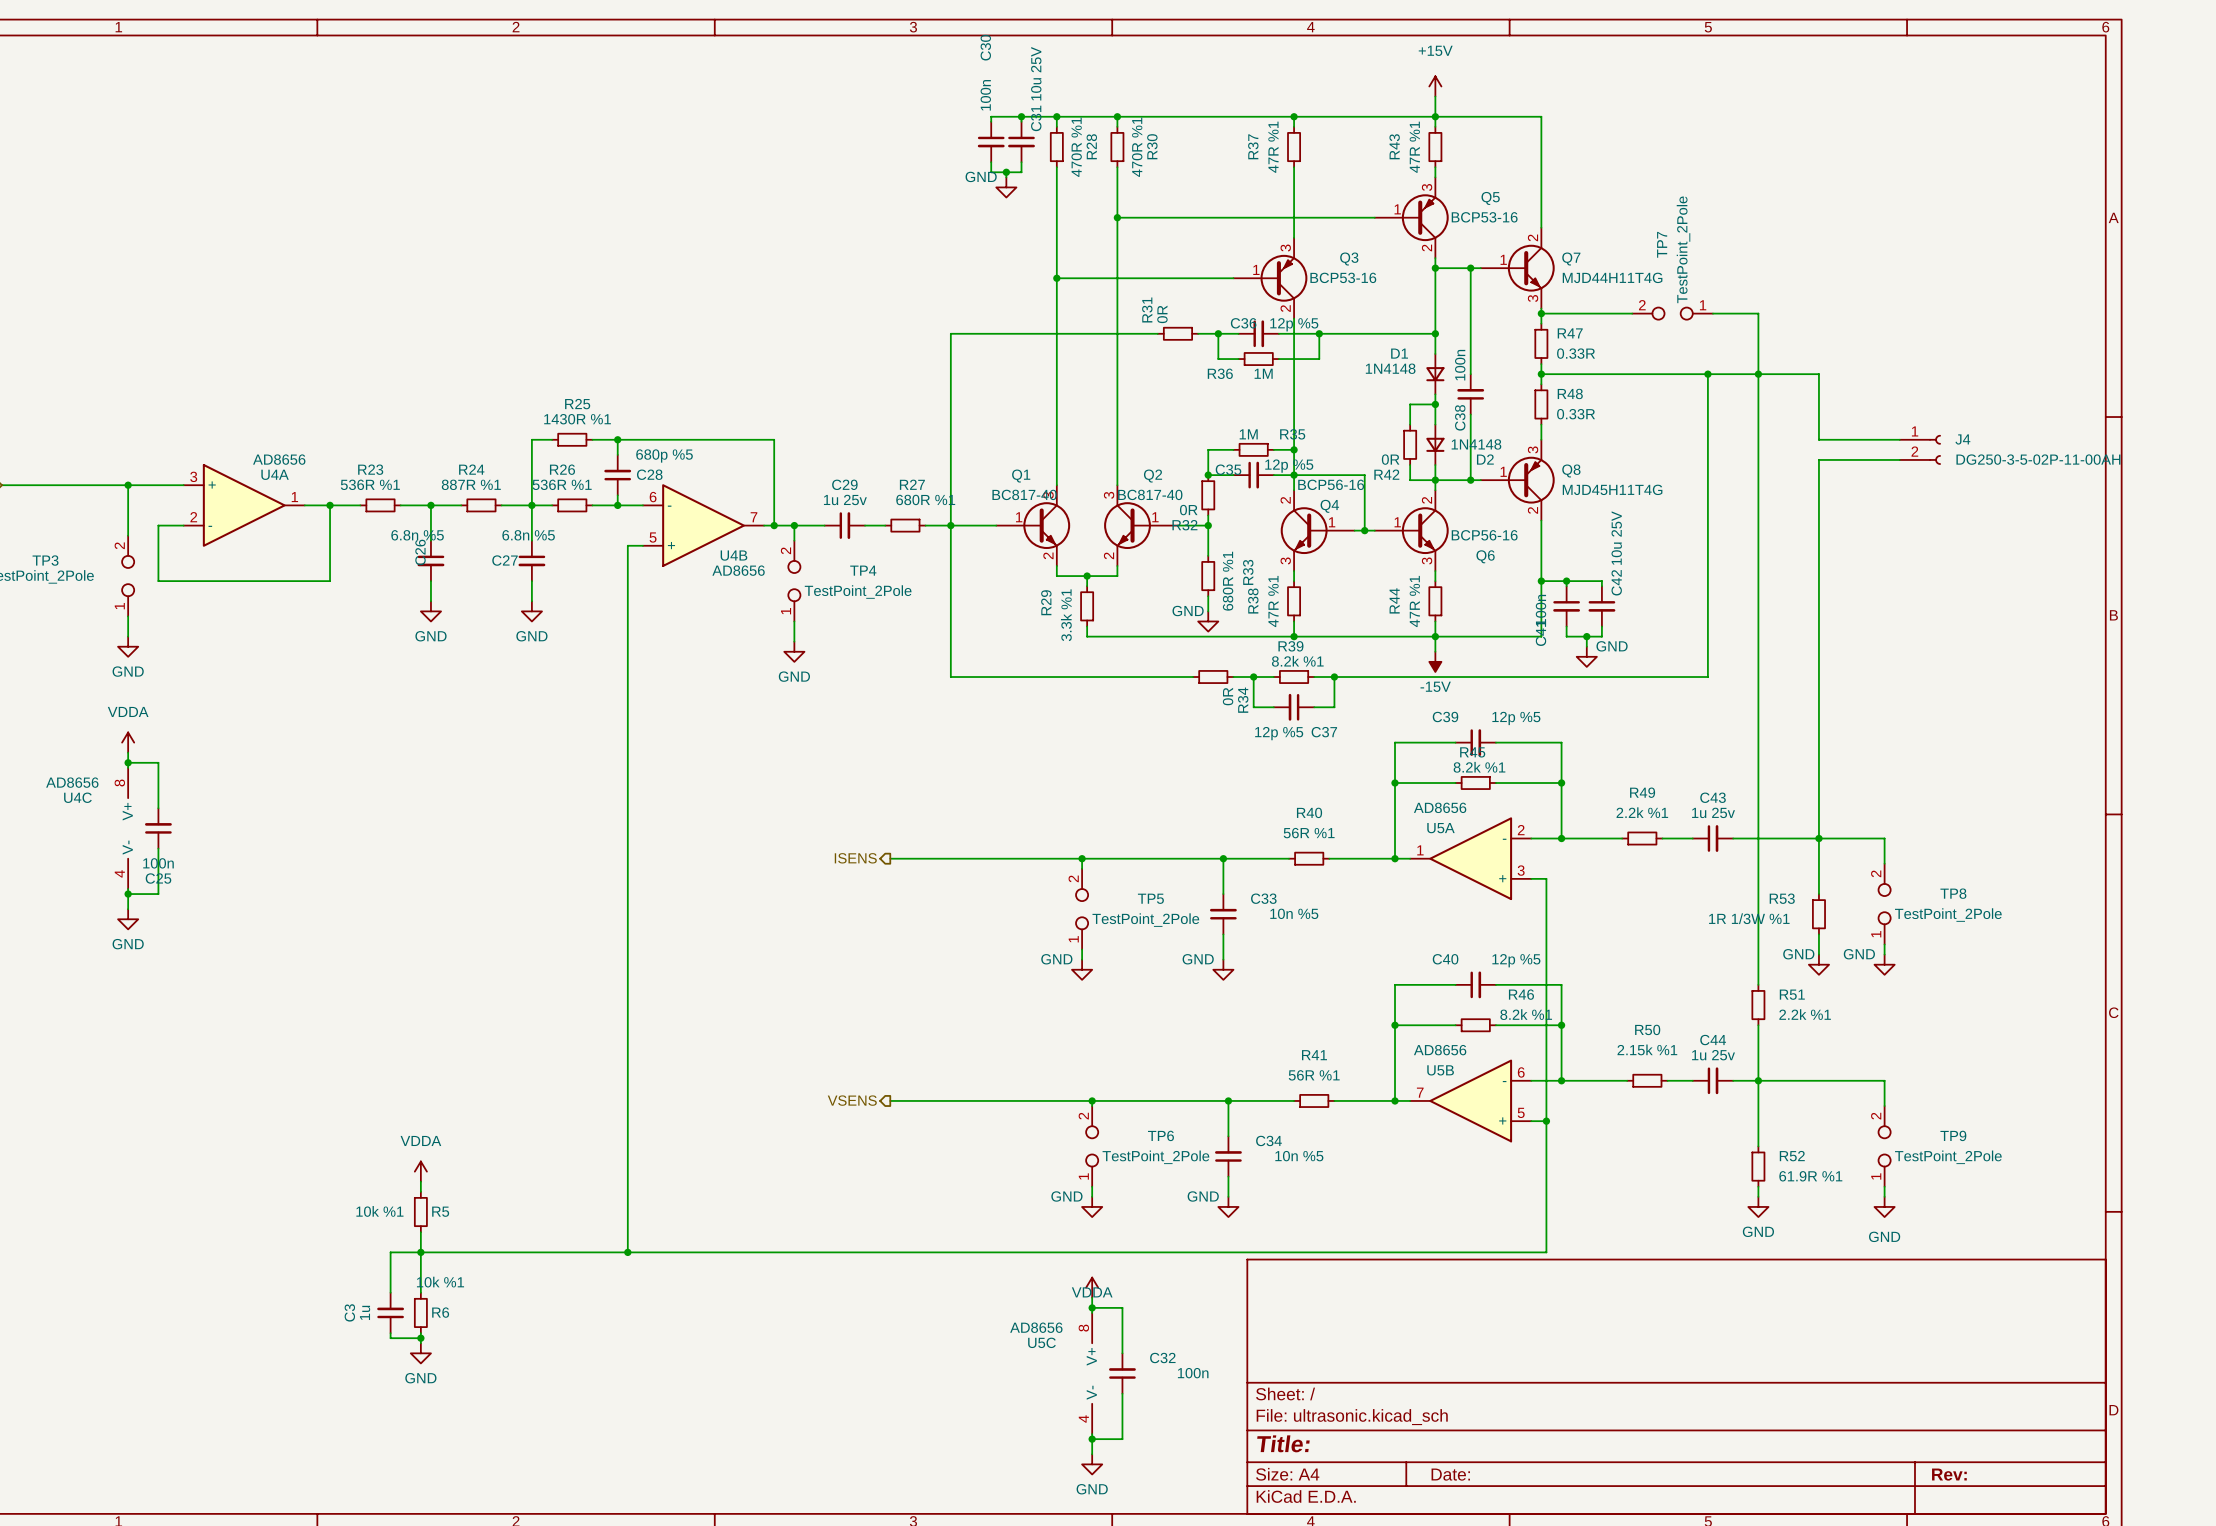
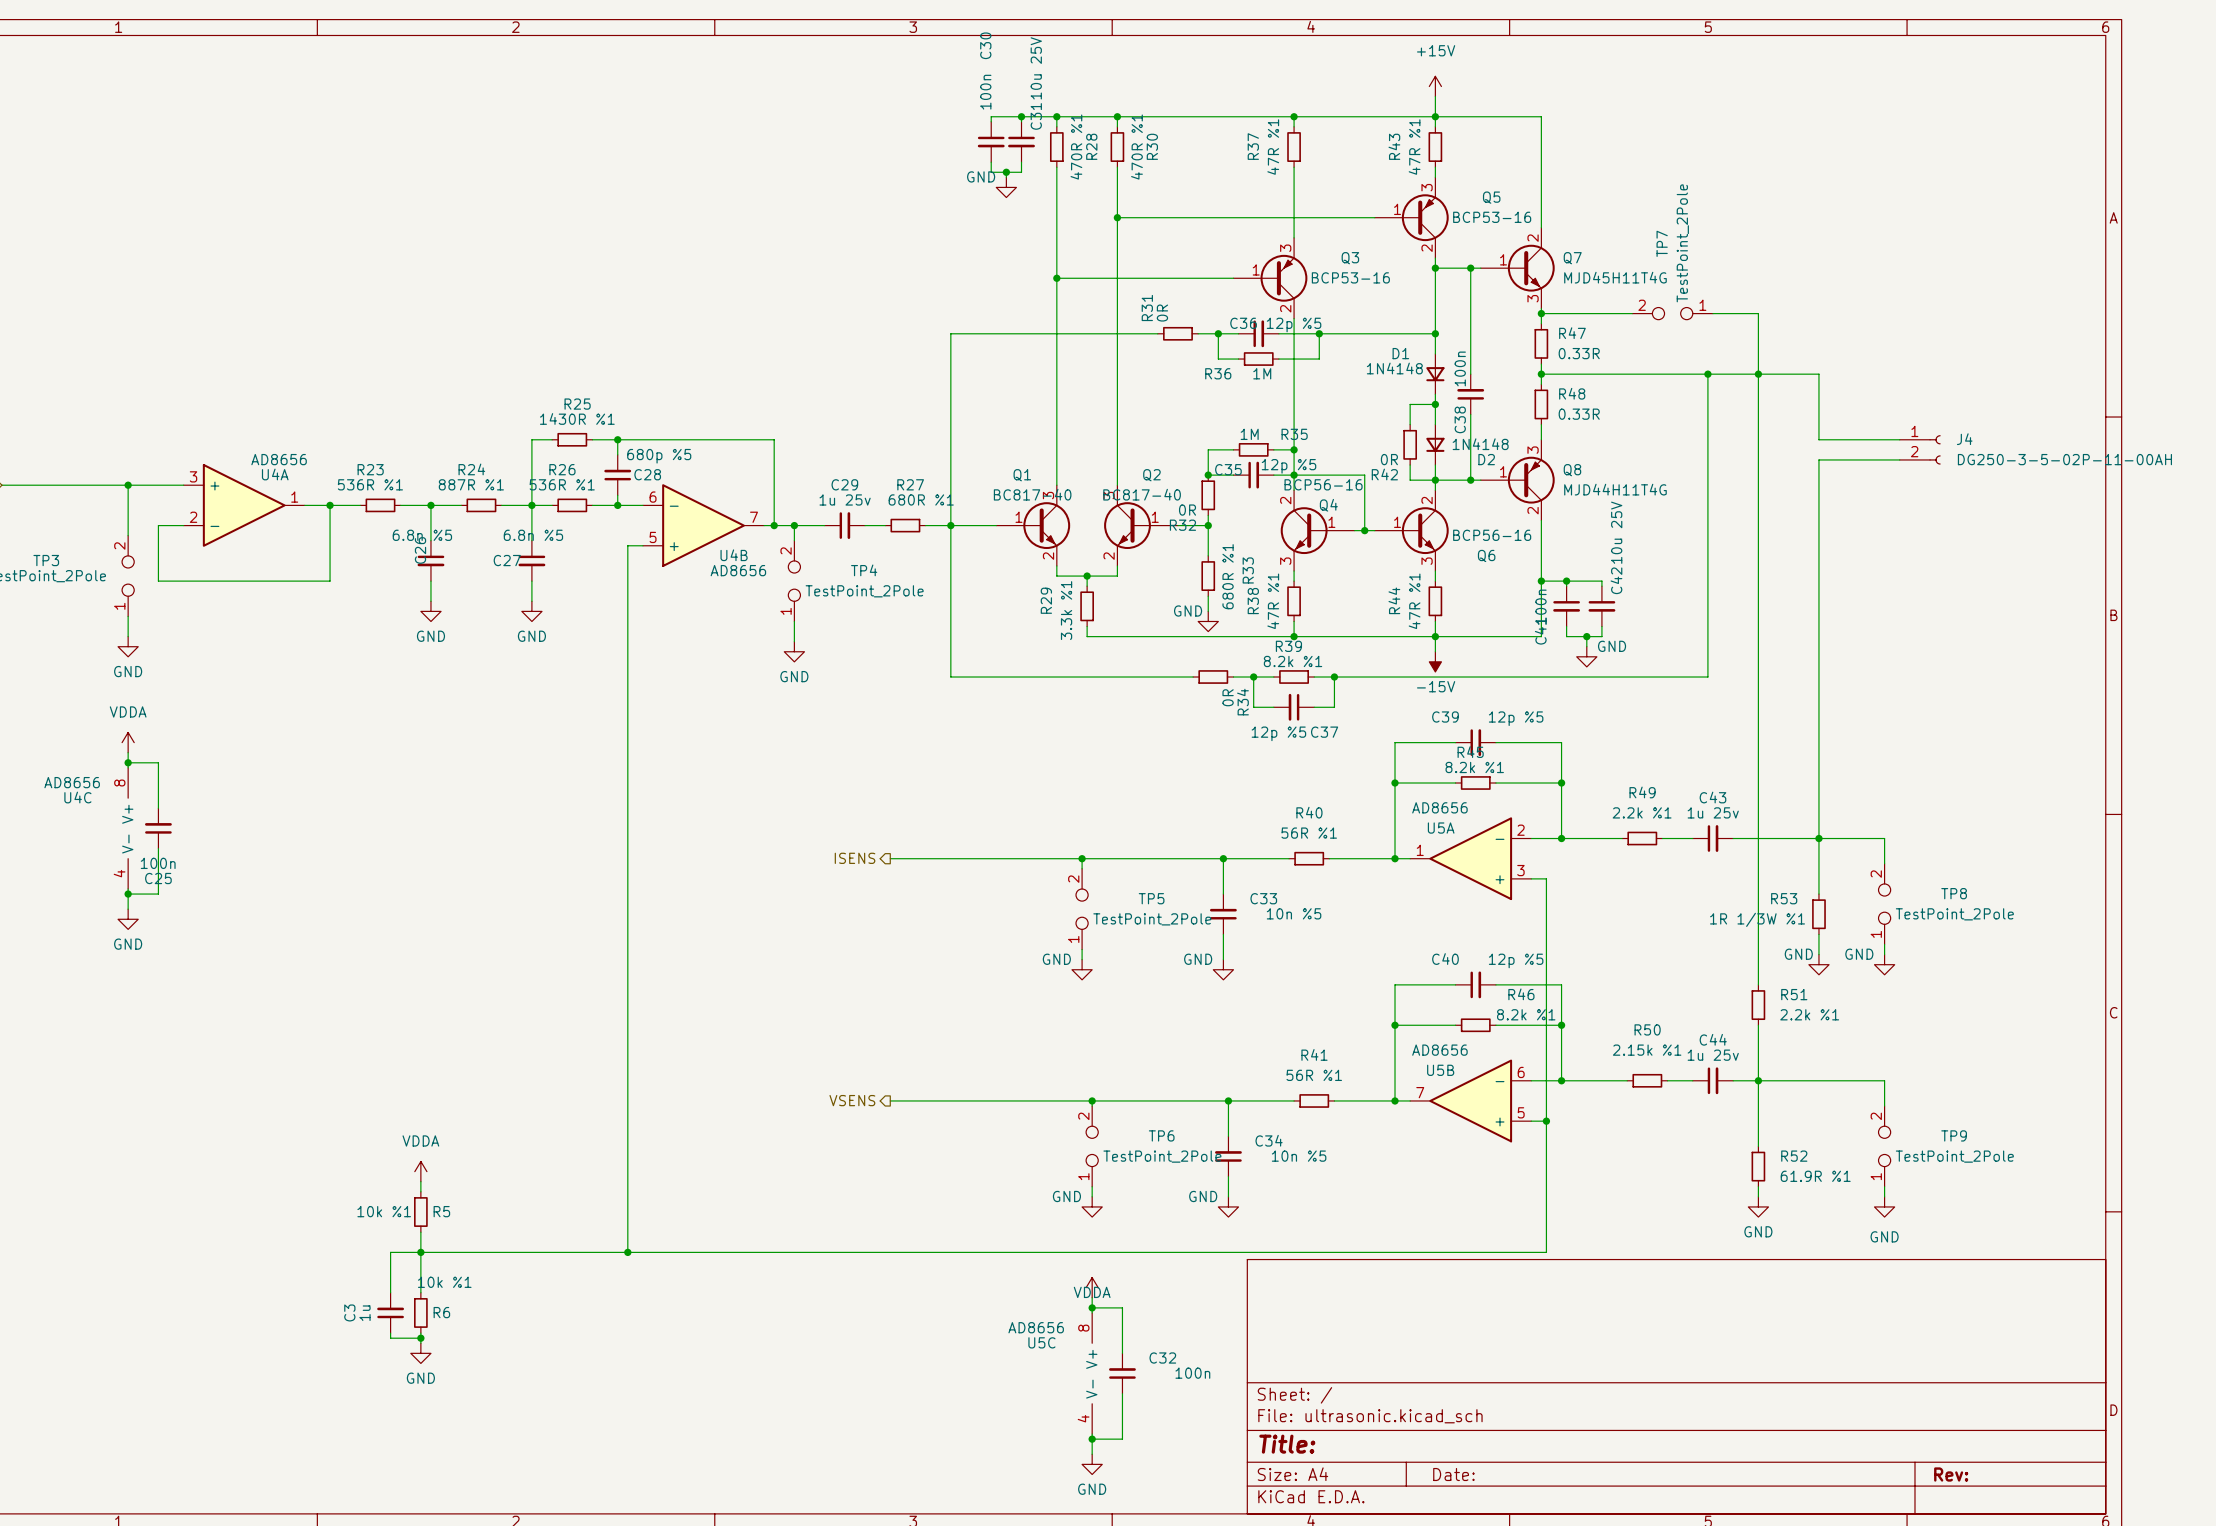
Q7 value: MJD44H11T4G (1612, 277) -> MJD45H11T4G (1615, 277)
Q8 value: MJD45H11T4G (1612, 489) -> MJD44H11T4G (1615, 489)

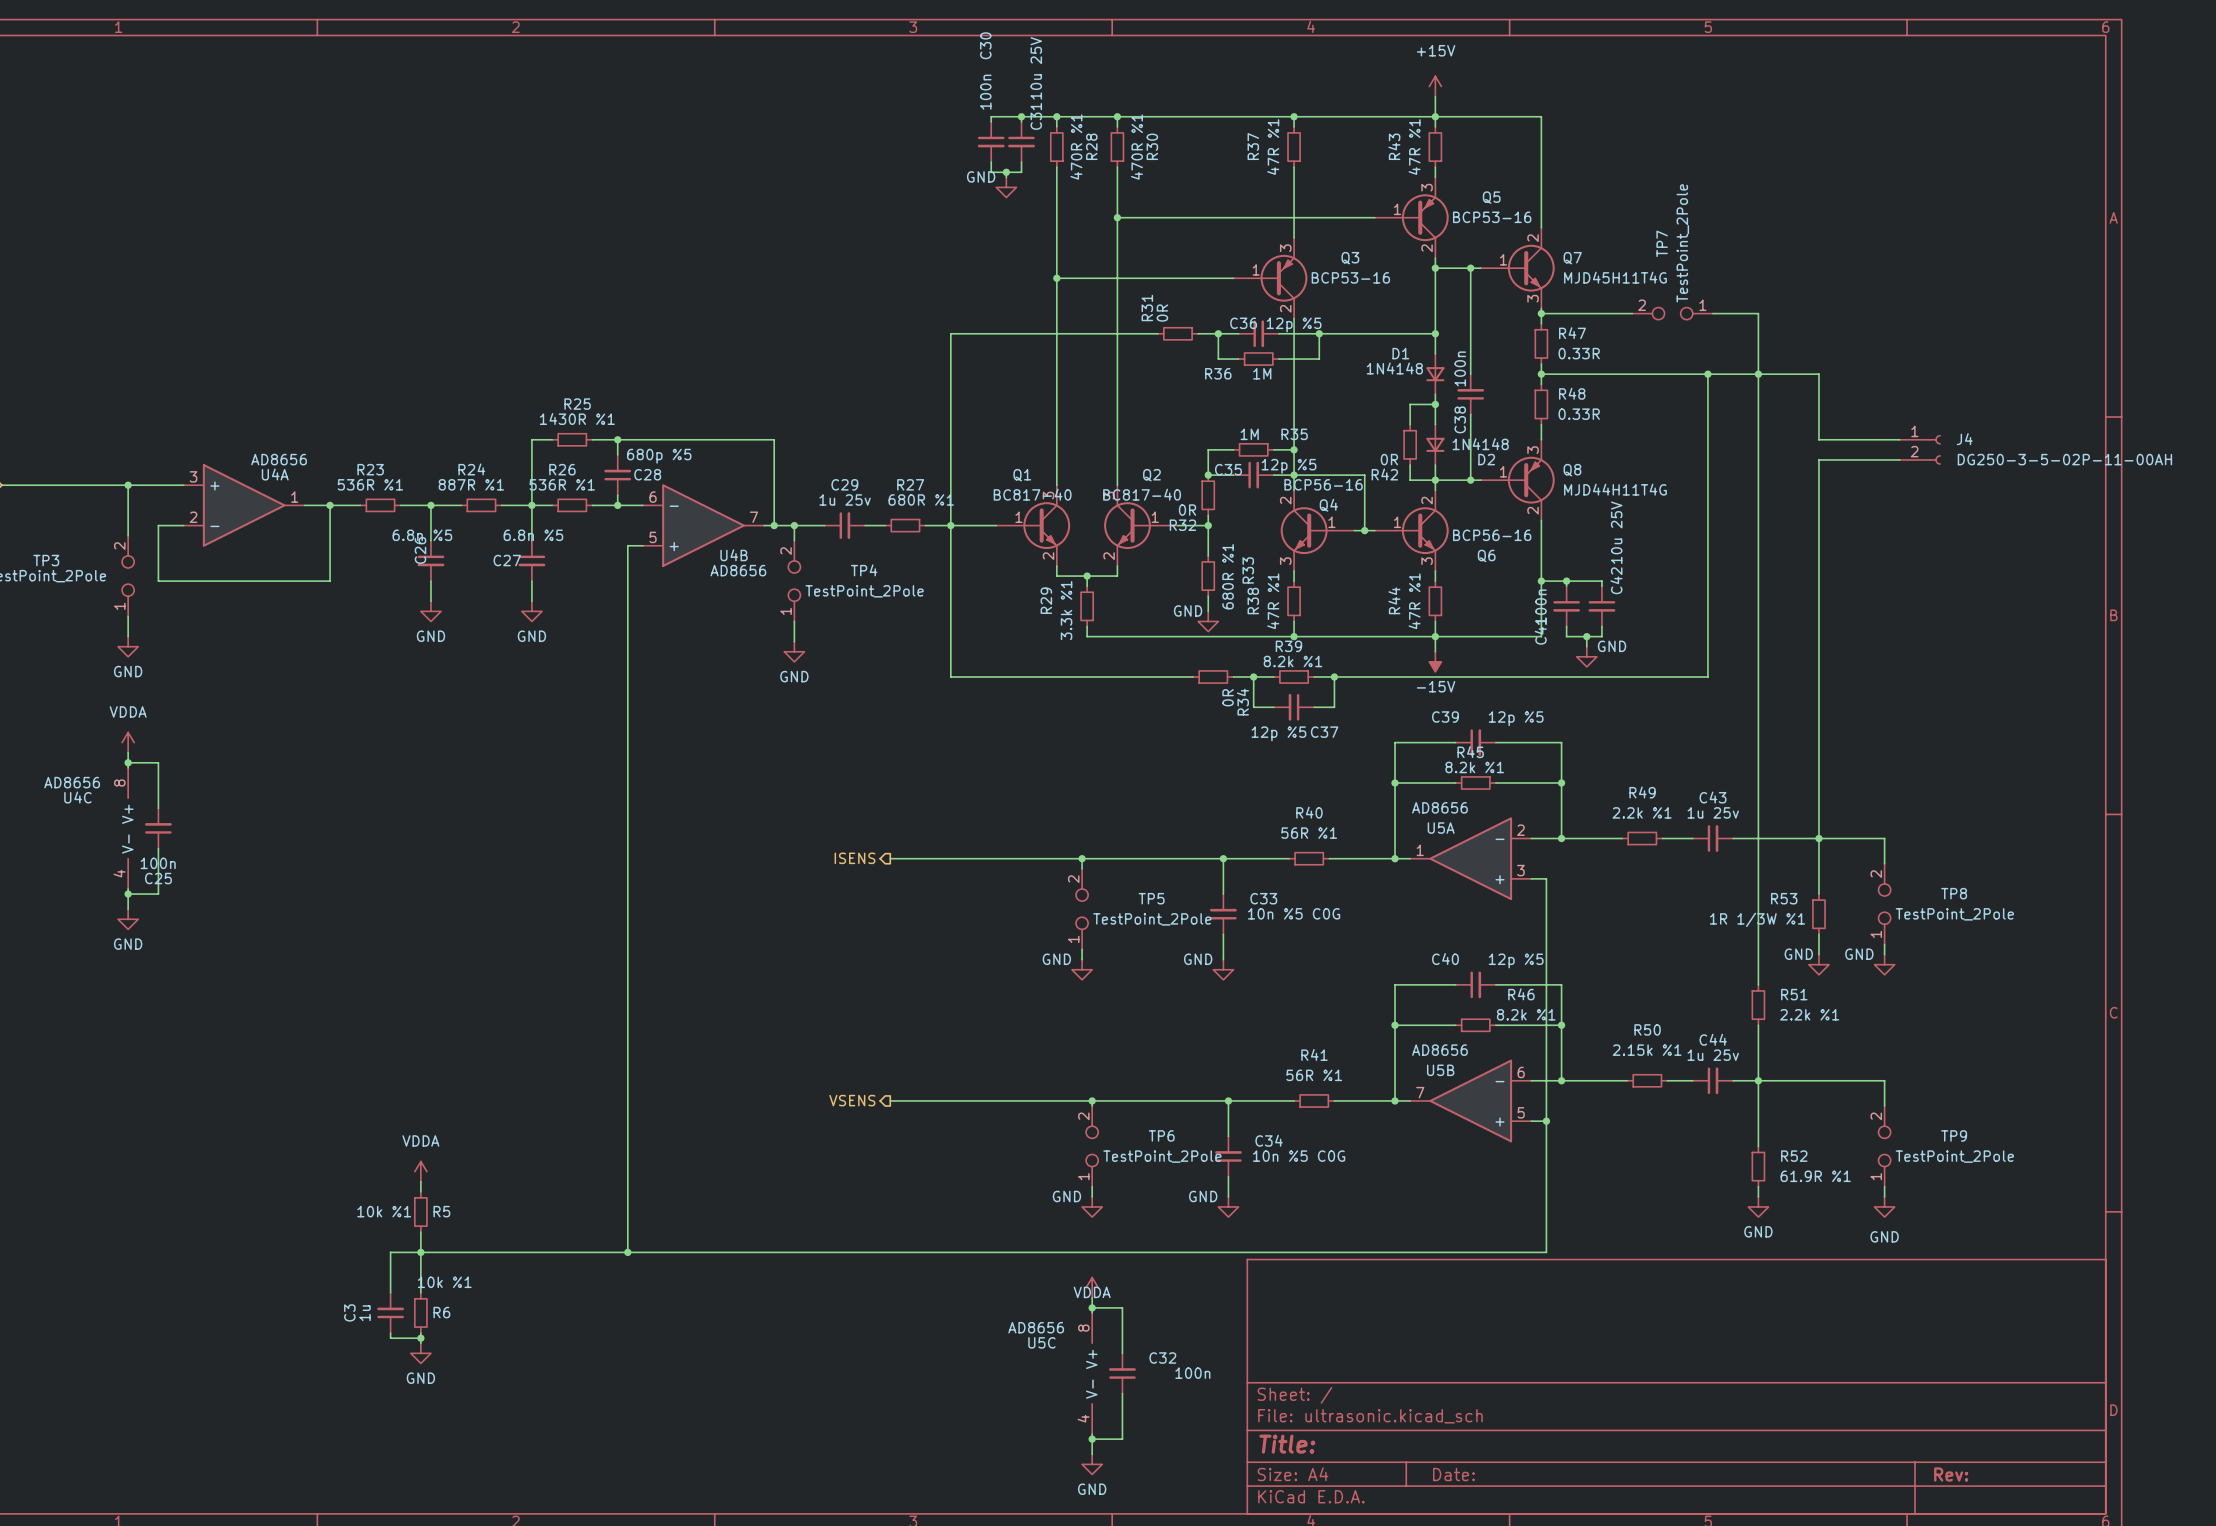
C33 value: 10n %5 (1294, 913) -> 10n %5 C0G (1294, 913)
C34 value: 10n %5 (1299, 1156) -> 10n %5 C0G (1299, 1156)

